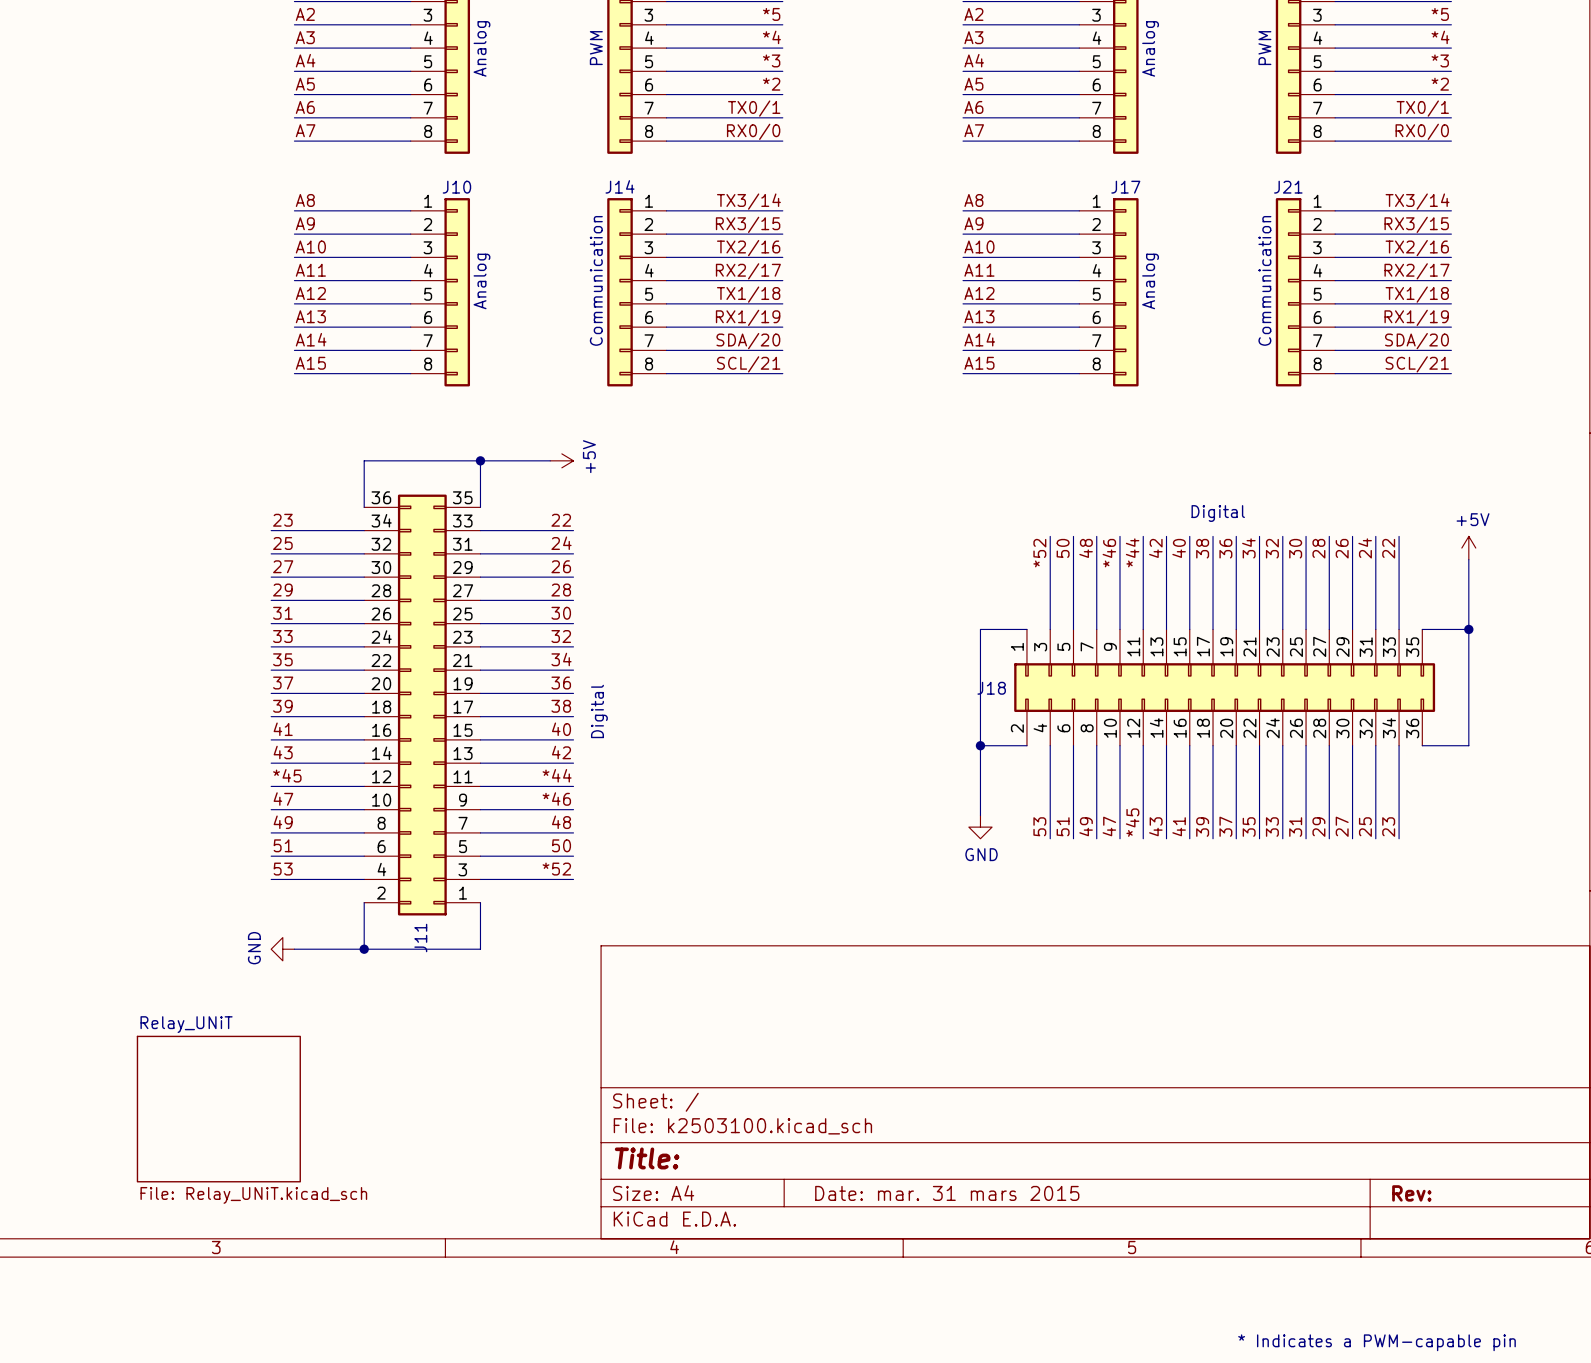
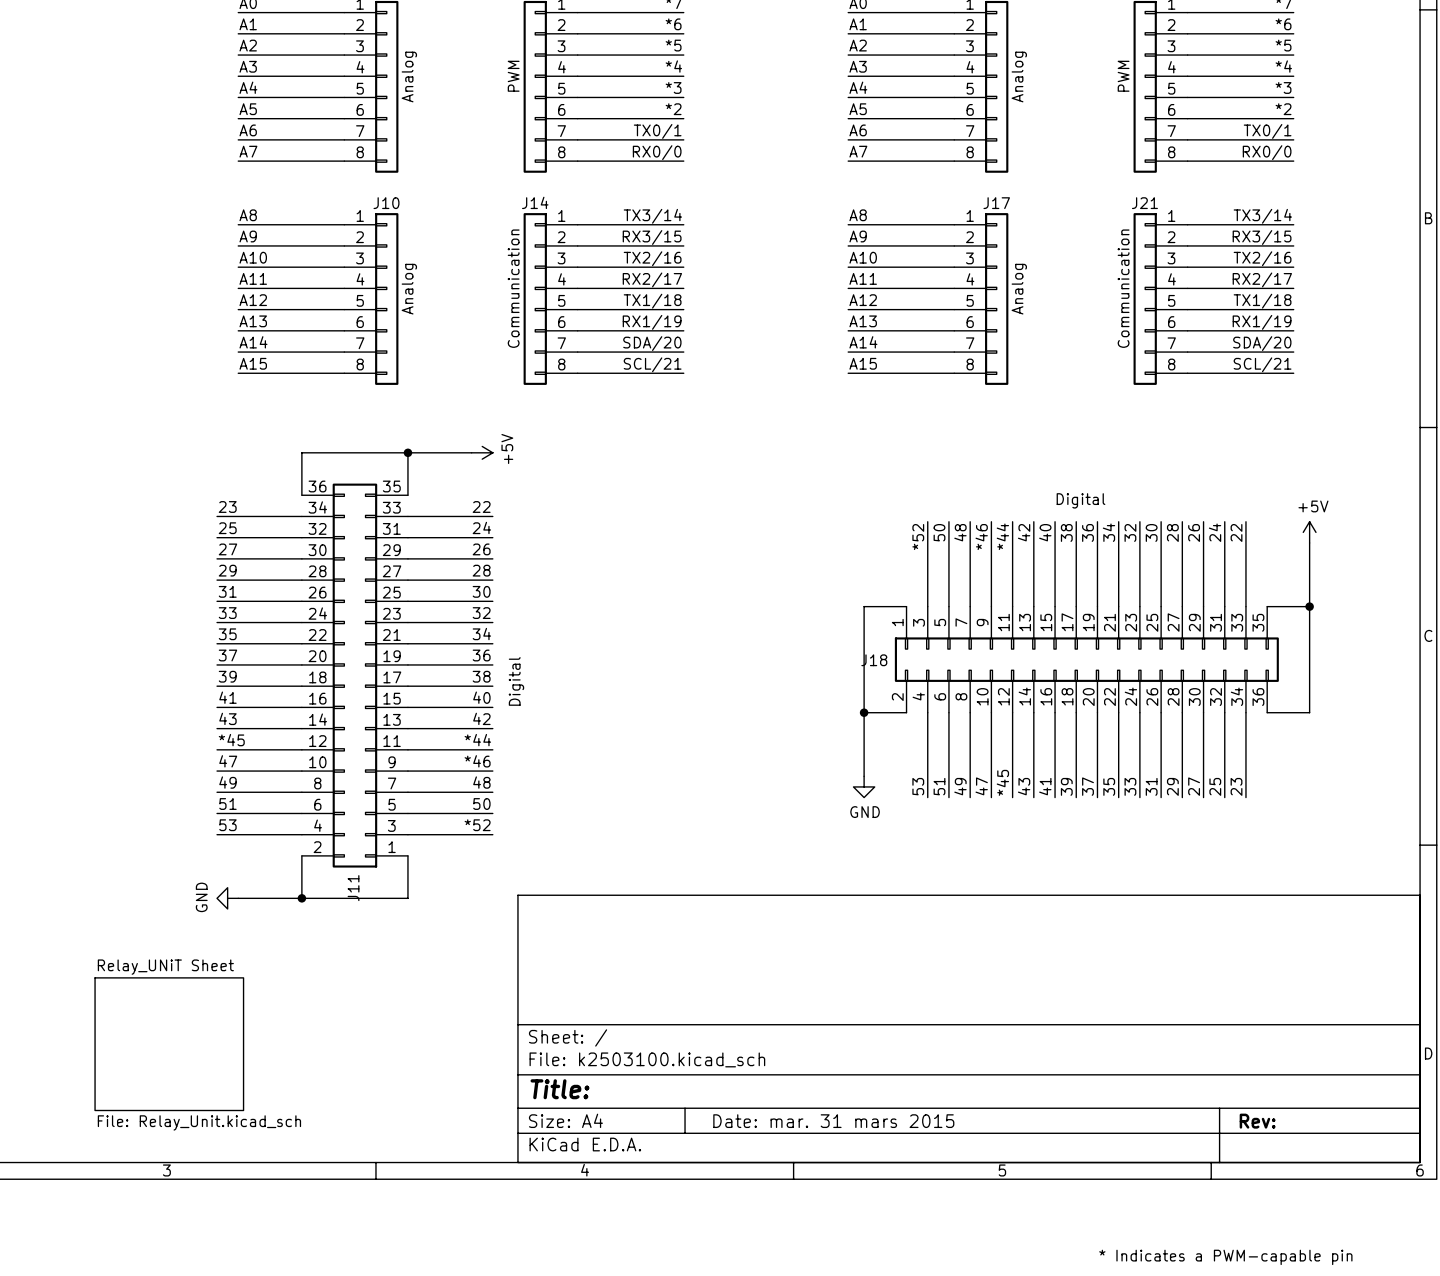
sheet Relay_UNiT name: Relay_UNiT (186, 1024) -> Relay_UNiT Sheet (165, 967)
sheet Relay_UNiT value: File: Relay_UNiT.kicad_sch (253, 1195) -> File: Relay_Unit.kicad_sch (199, 1122)

